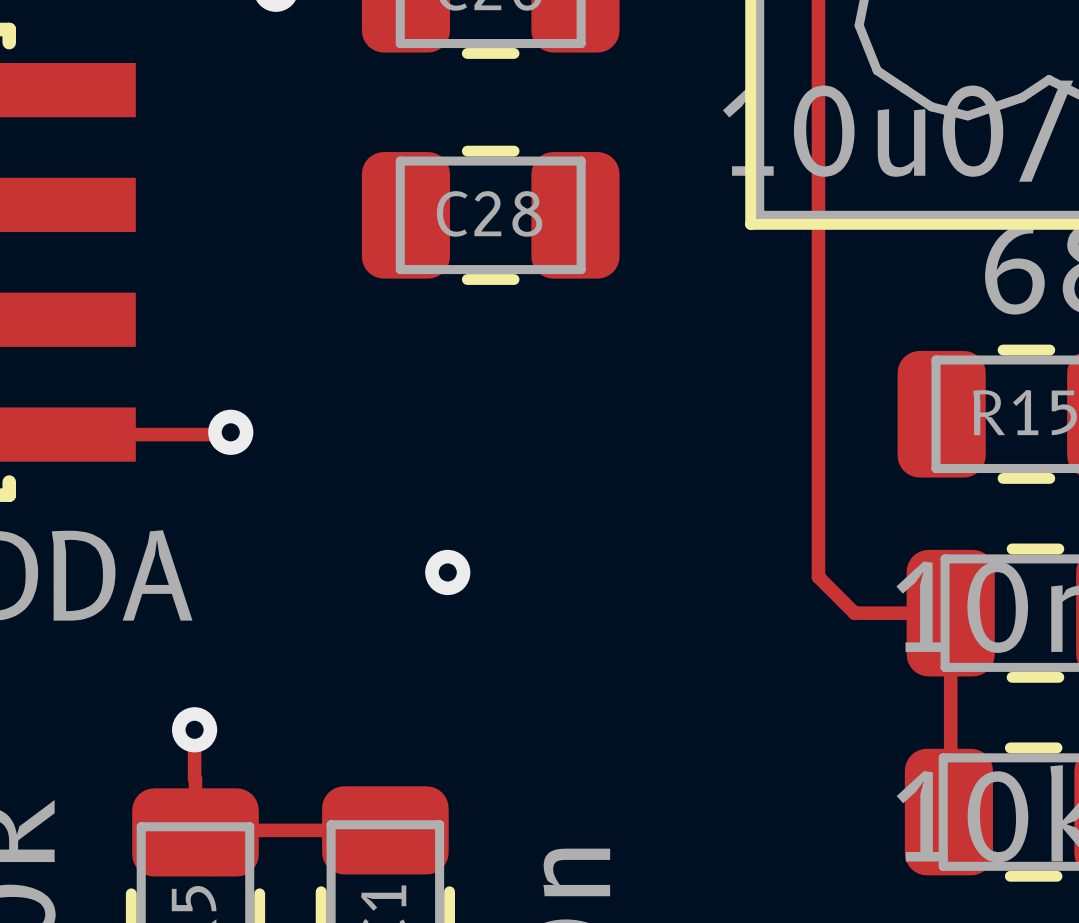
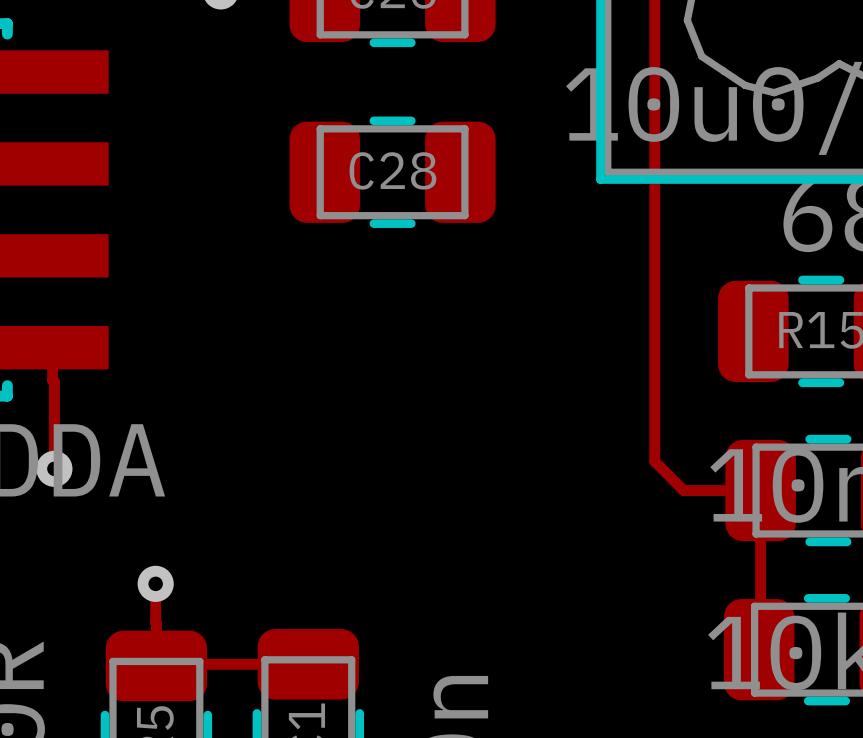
top track: (230, 432) (228, 434) (65, 434) -> (54, 468) (52, 347)
via: (230, 432) -> none
via: (447, 572) -> none
via: none -> (54, 468)

